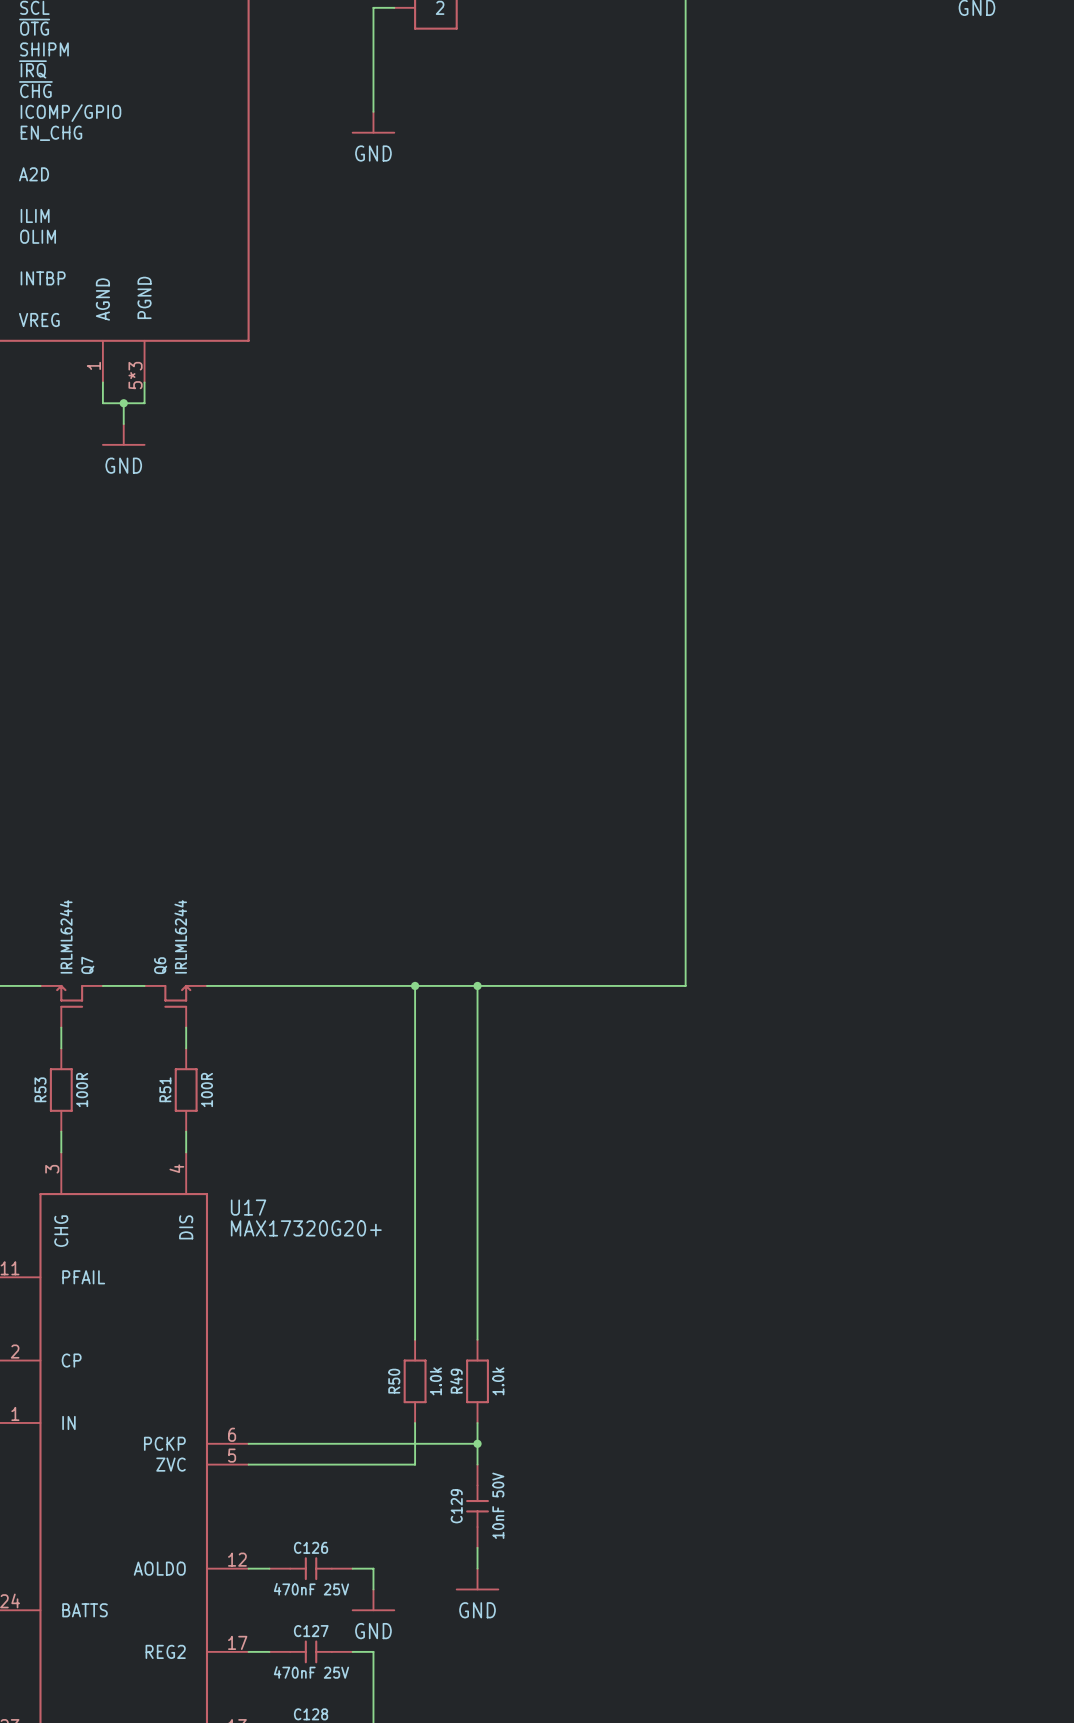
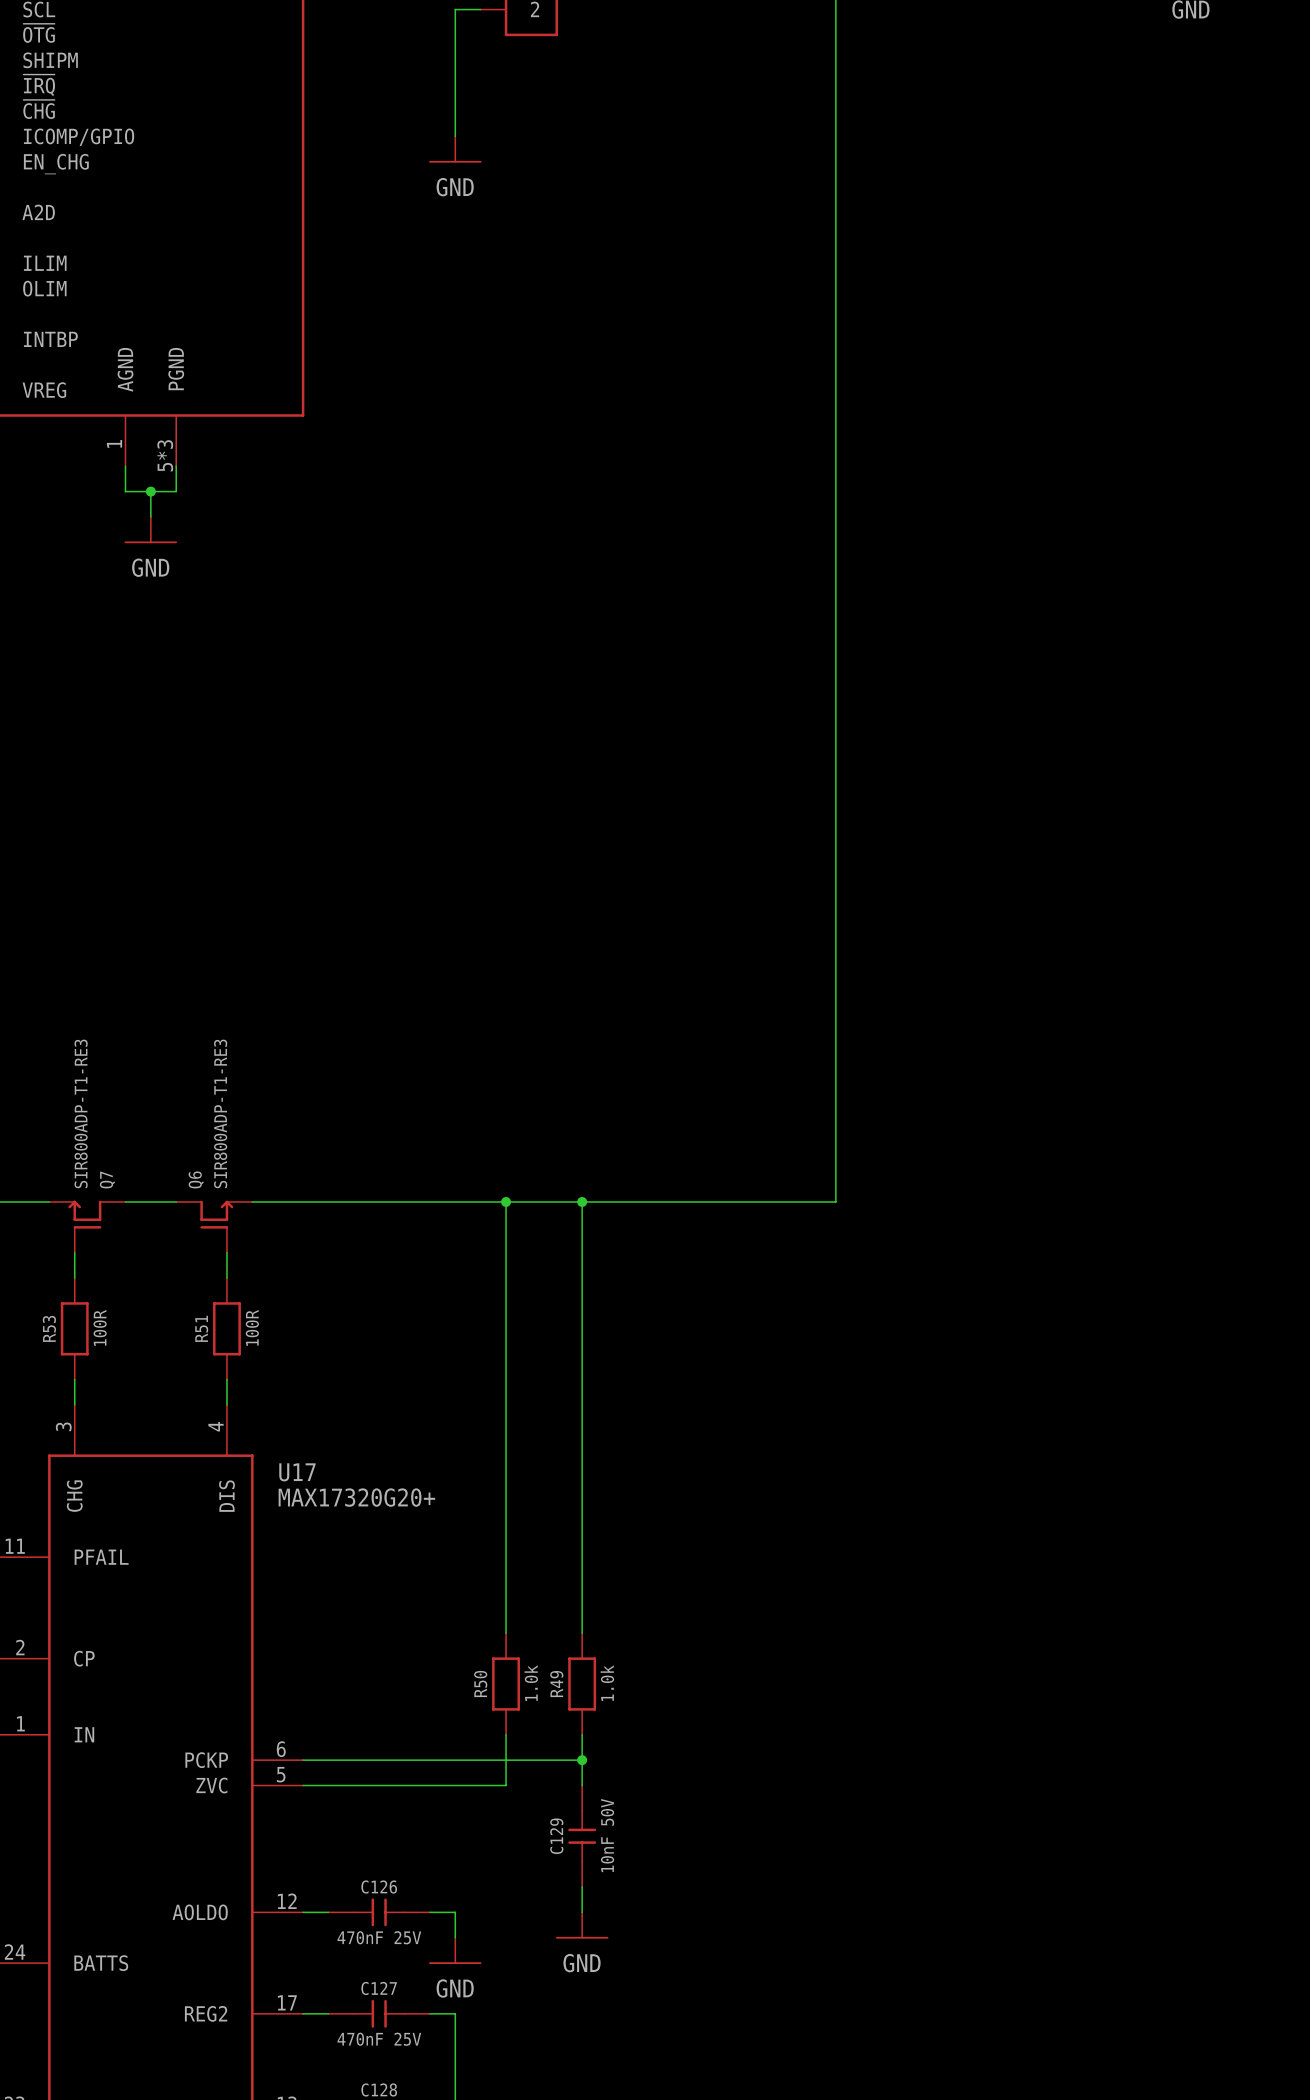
Q7 value: IRLML6244 (66, 936) -> SIR800ADP-T1-RE3 (81, 1113)
Q6 value: IRLML6244 (180, 936) -> SIR800ADP-T1-RE3 (220, 1113)

